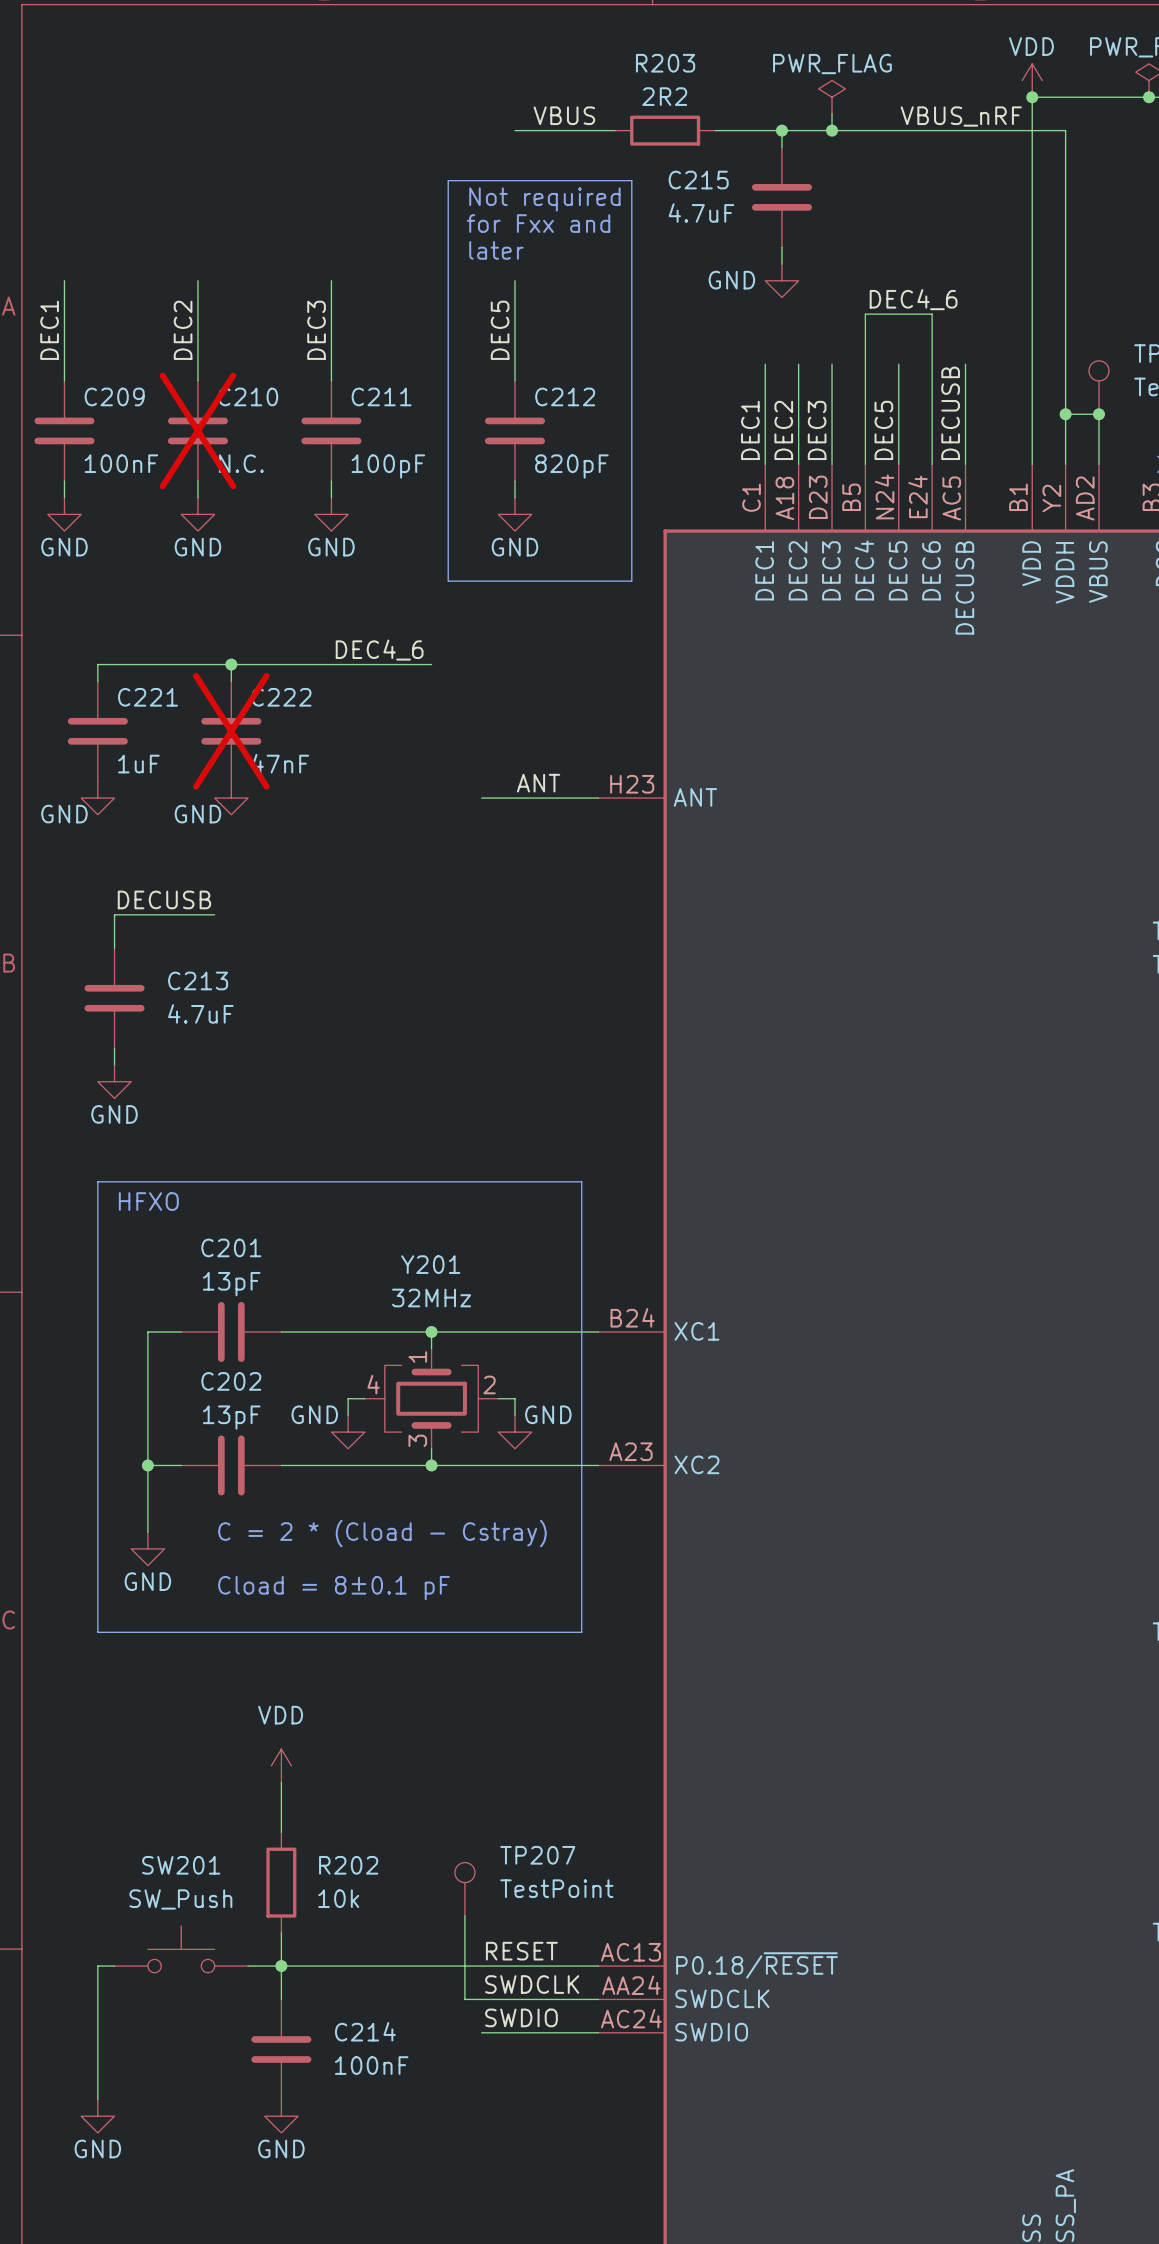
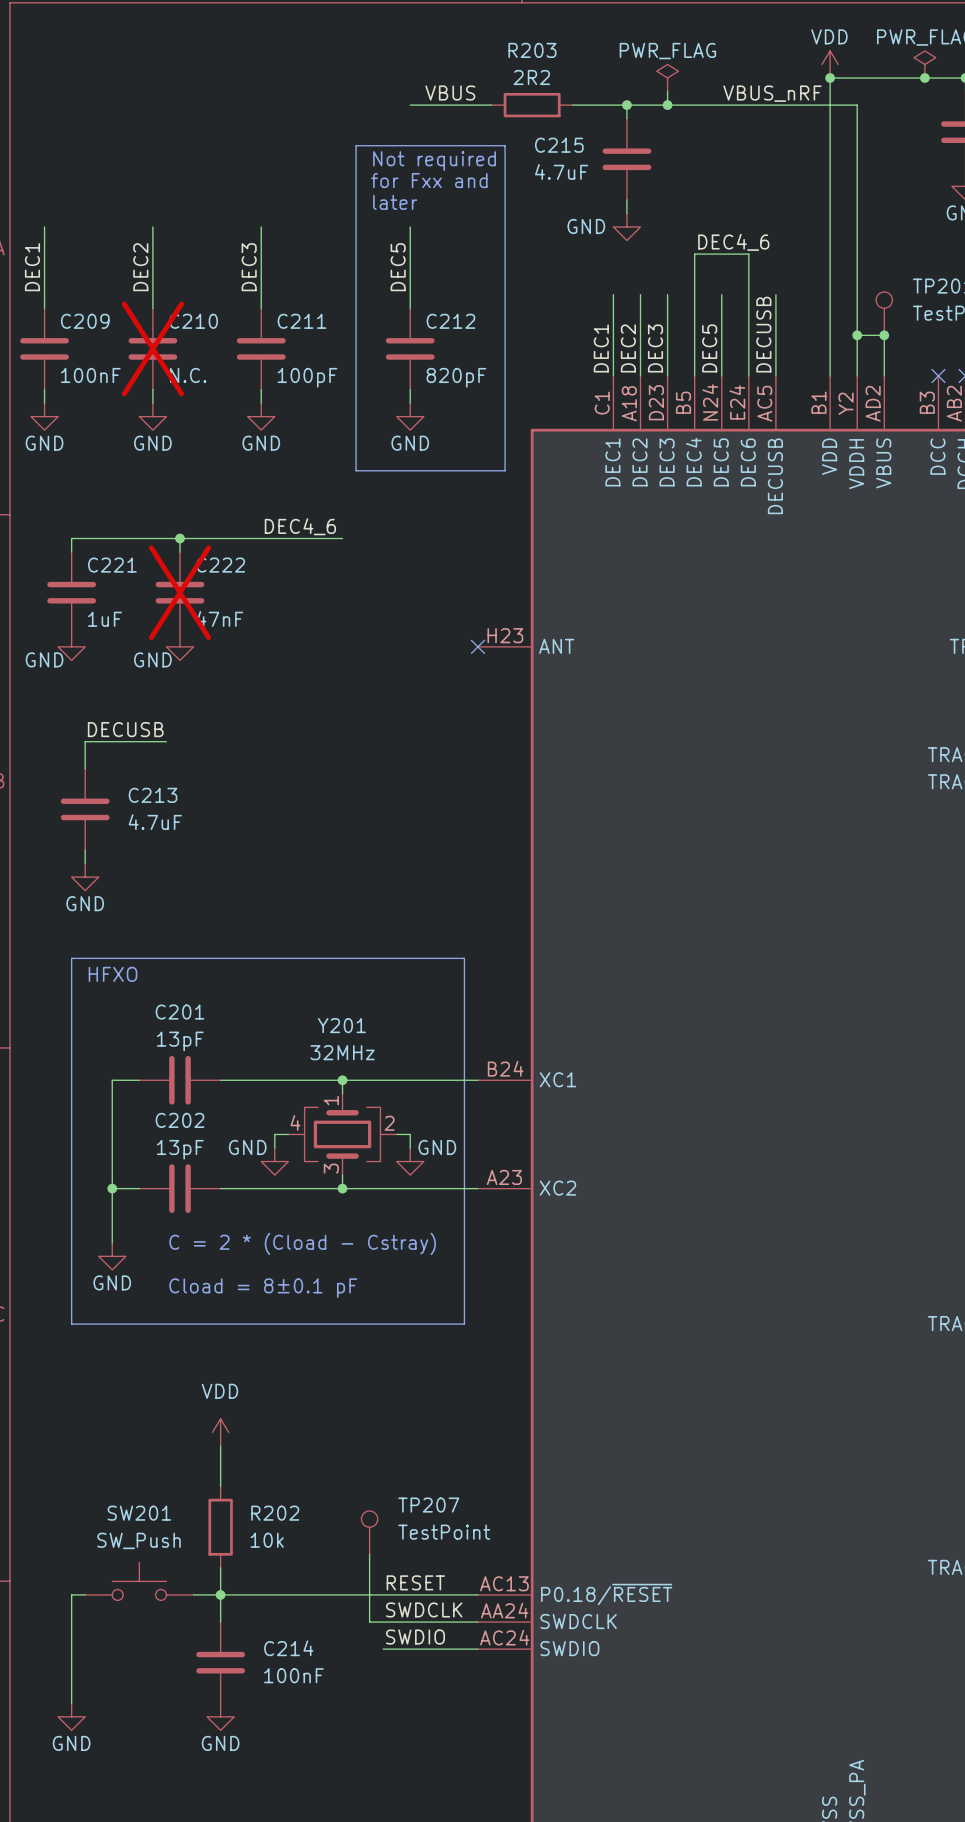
label: ANT (538, 783) -> none
wire: (481, 798) (598, 798) -> none
no-connect mark: none -> (477, 646)

